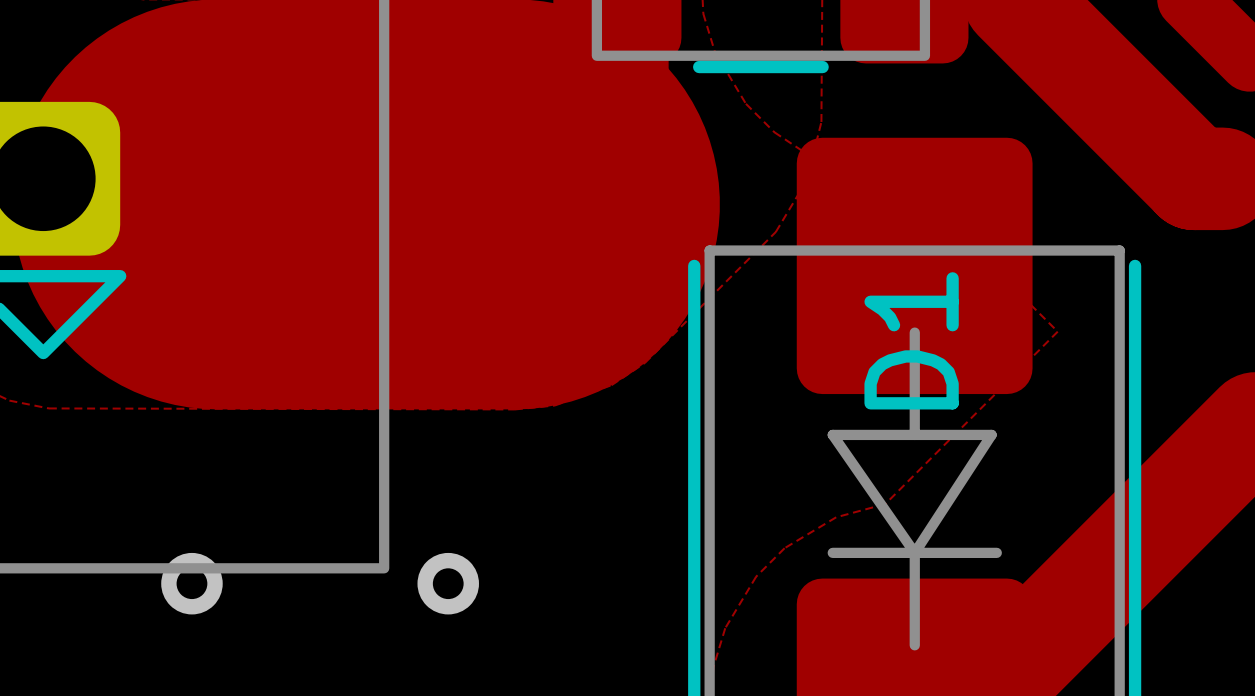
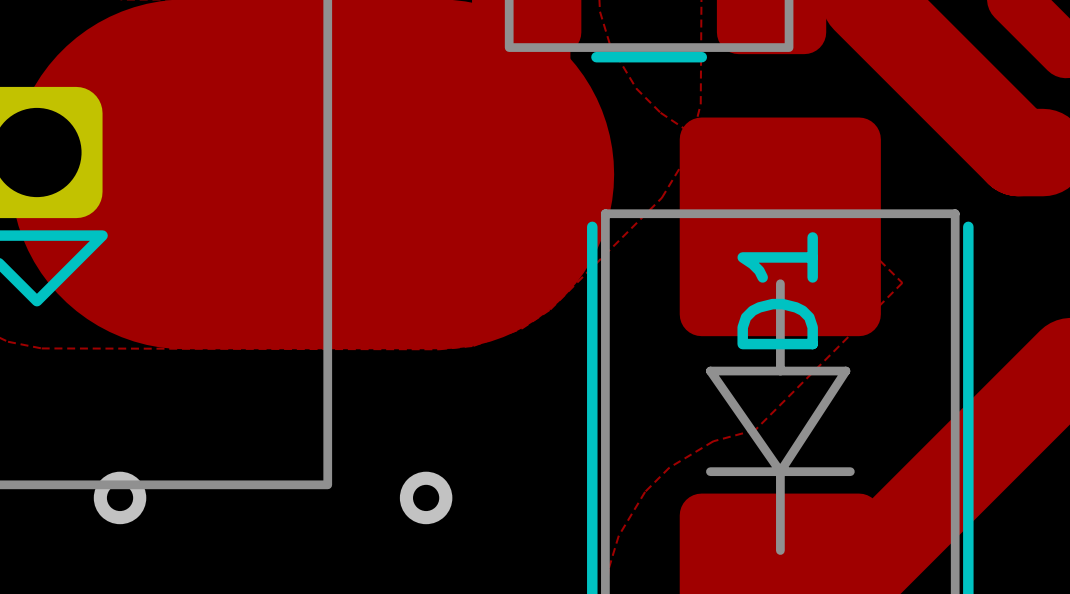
via position: (191, 583) -> (120, 497)
via position: (448, 583) -> (426, 497)

